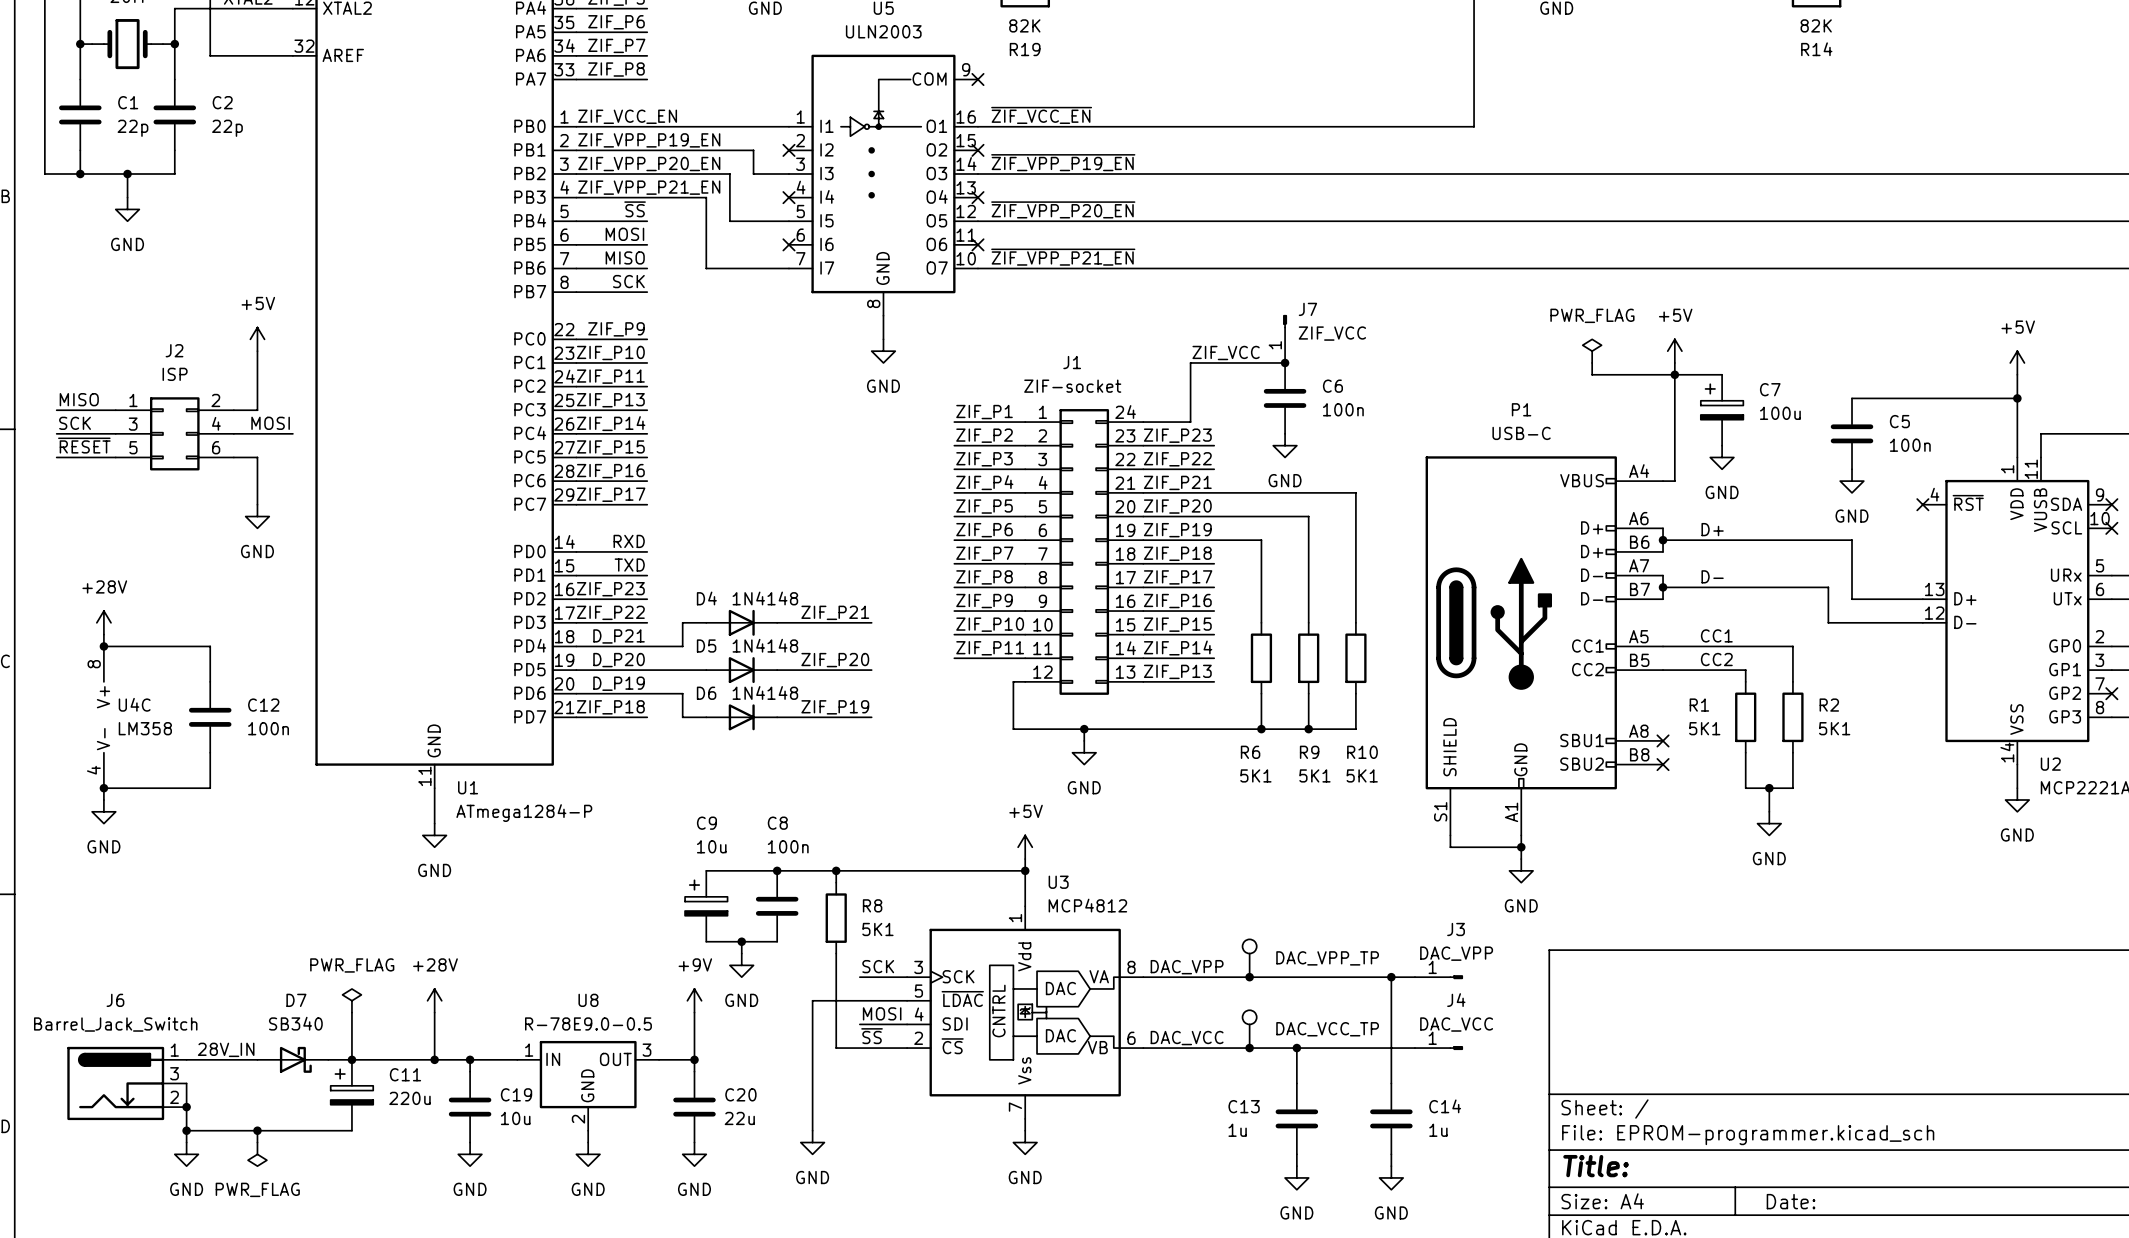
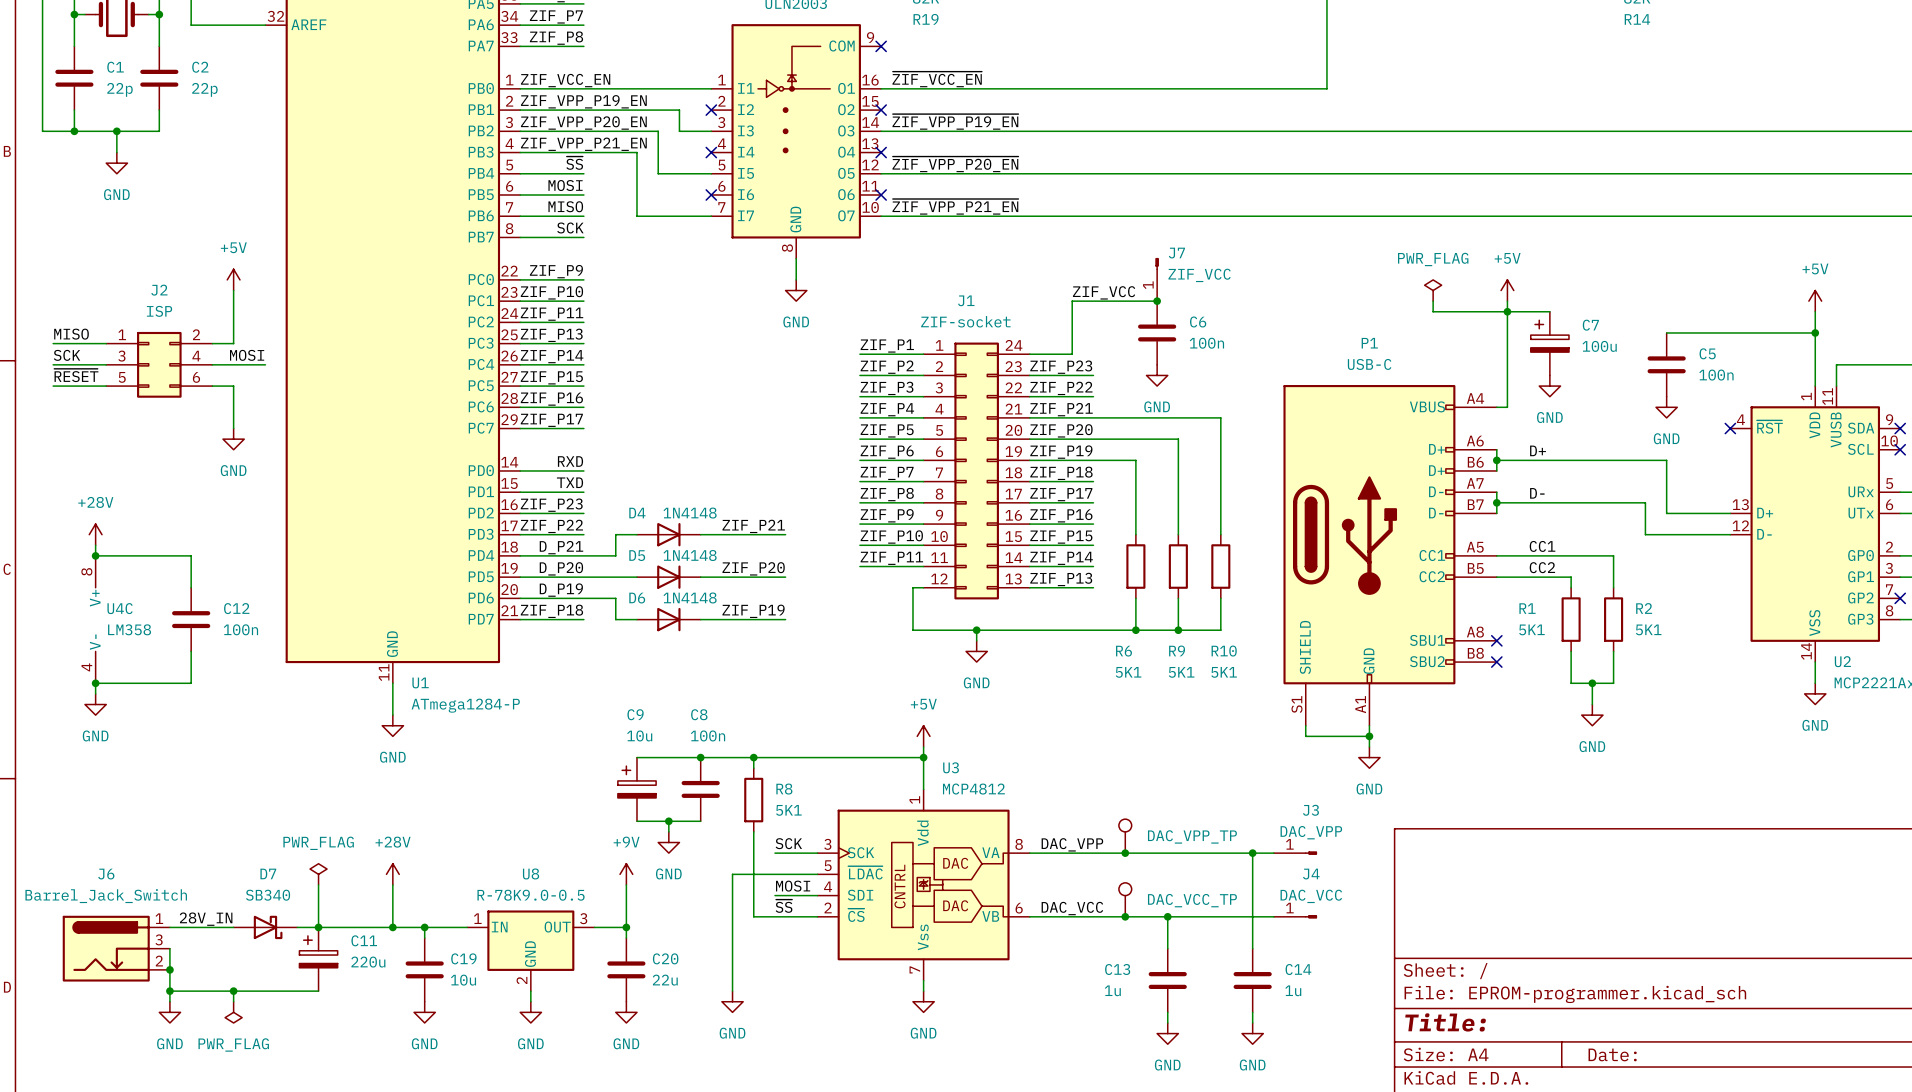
U8 value: R-78E9.0-0.5 (588, 1023) -> R-78K9.0-0.5 (531, 895)

